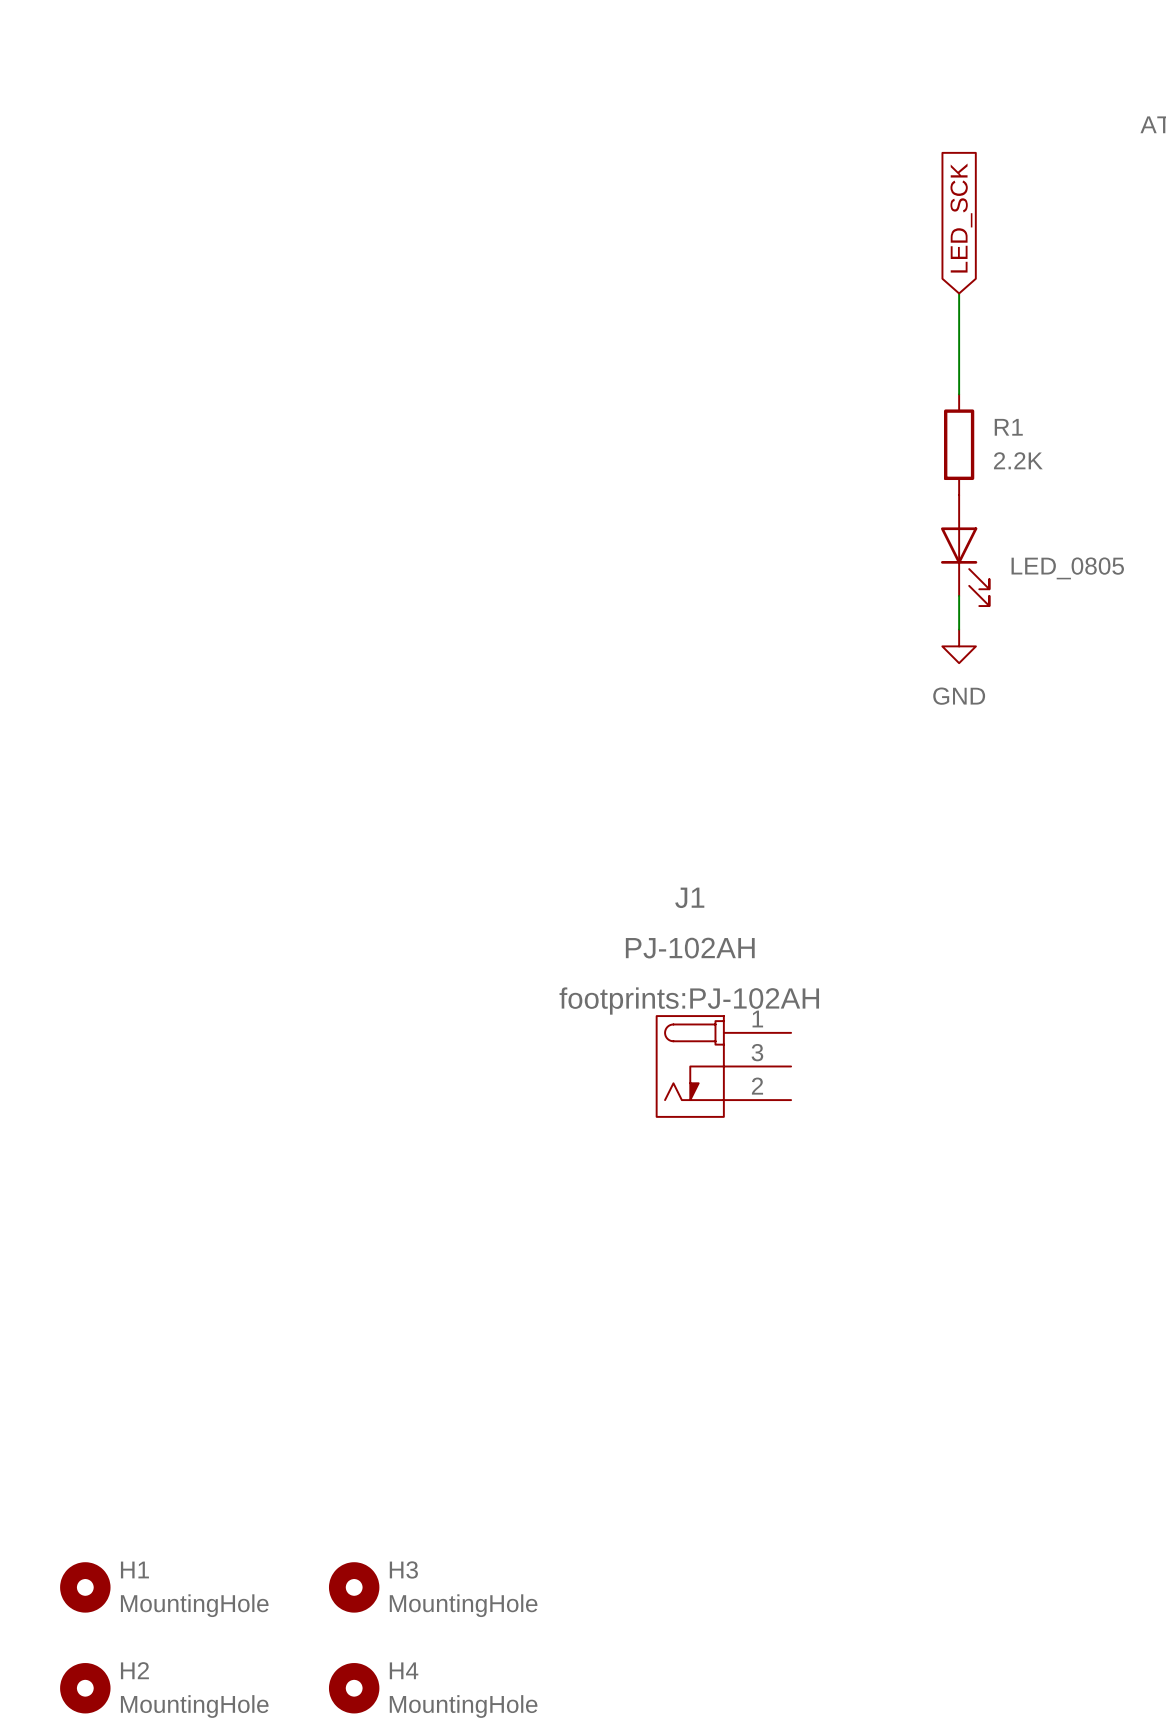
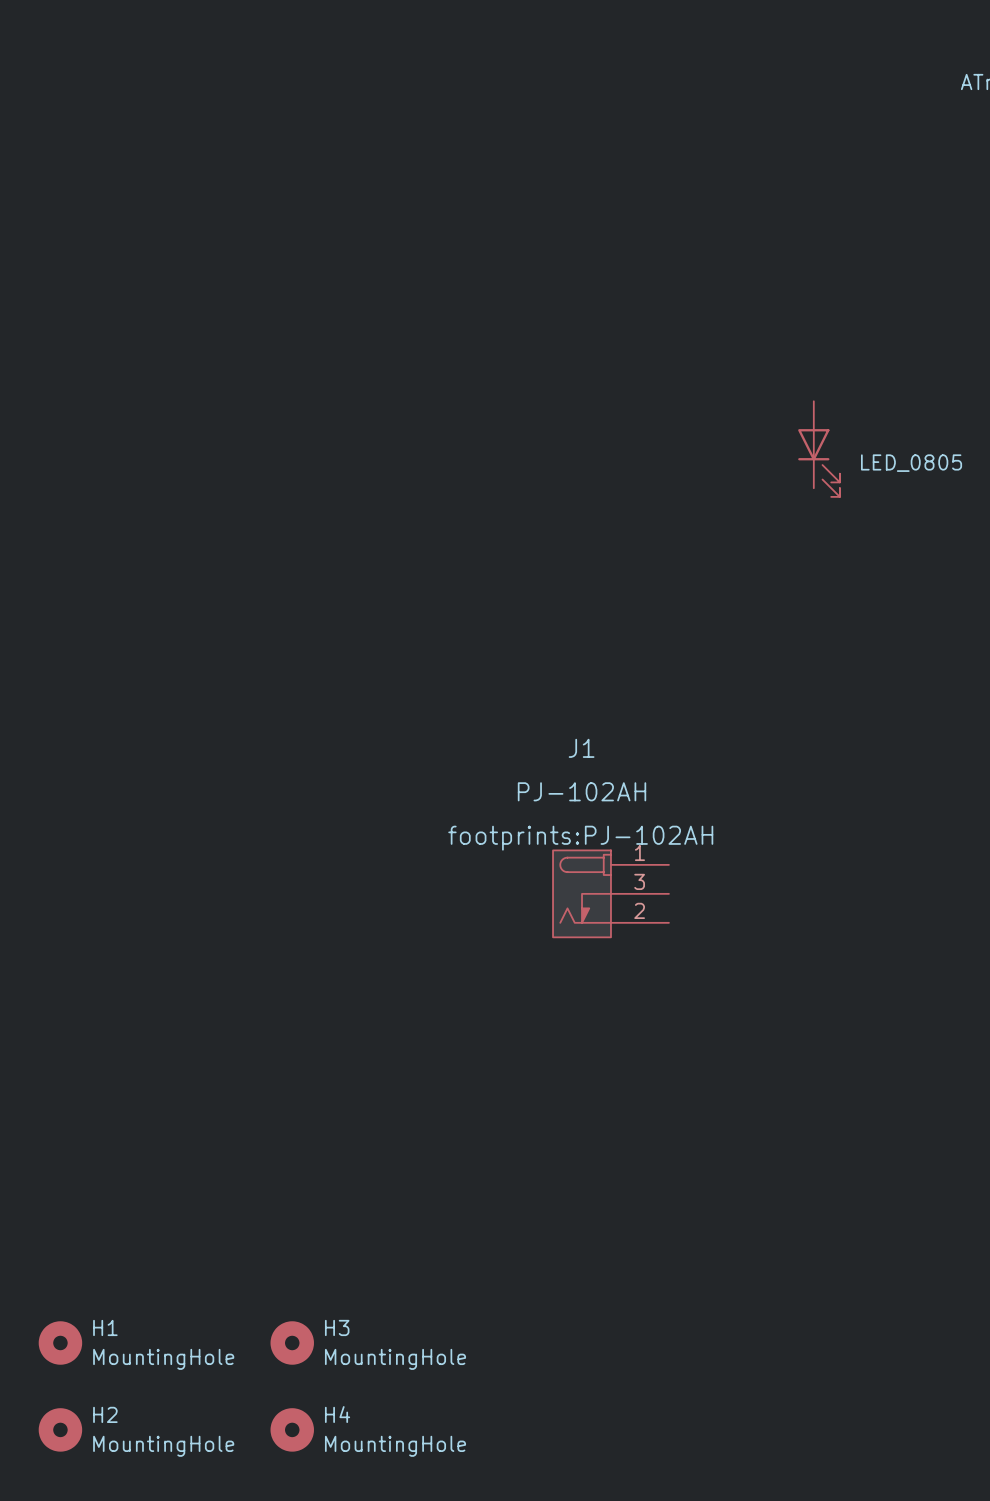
global label: LED_SCK (961, 218) -> none
wire: (959, 293) (959, 394) -> none
R1: 2.2K (959, 444) -> none
wire: (959, 595) (959, 629) -> none
power symbol: GND (959, 646) -> none

